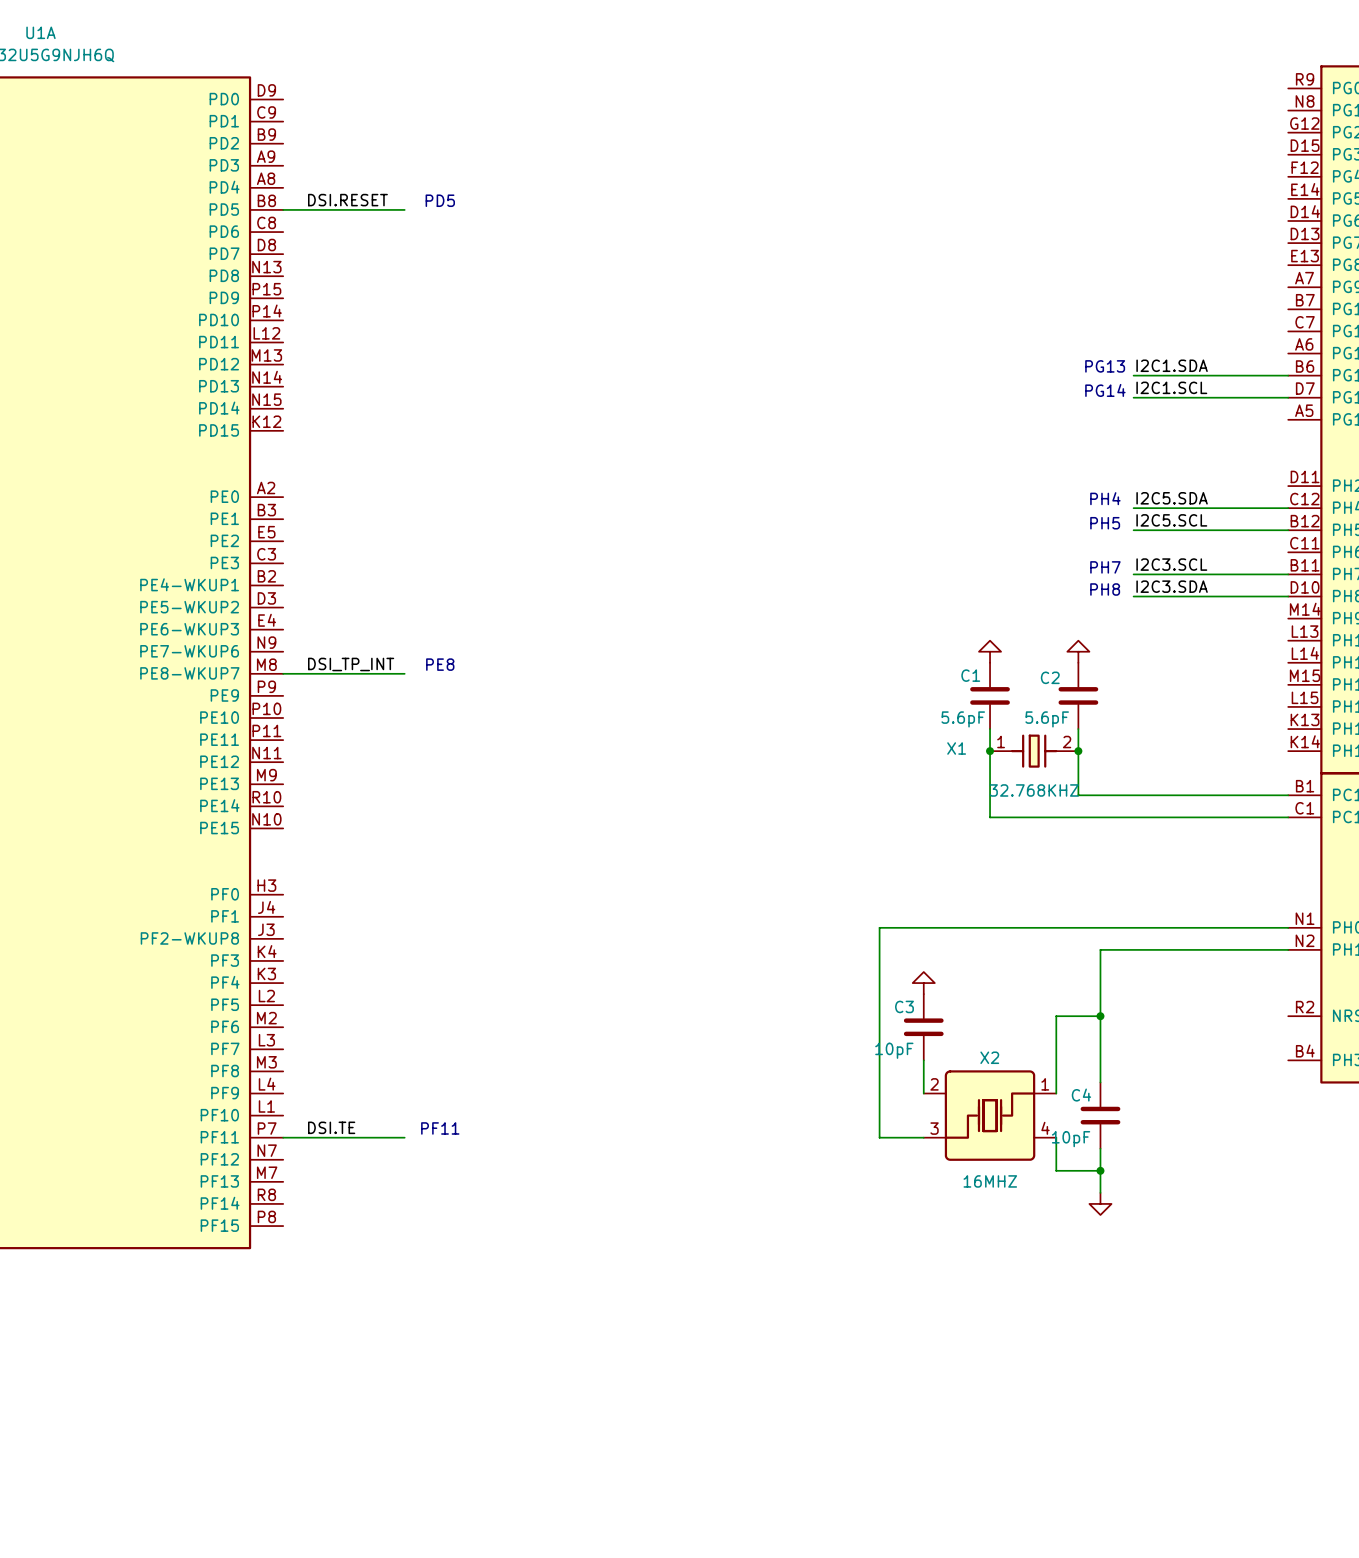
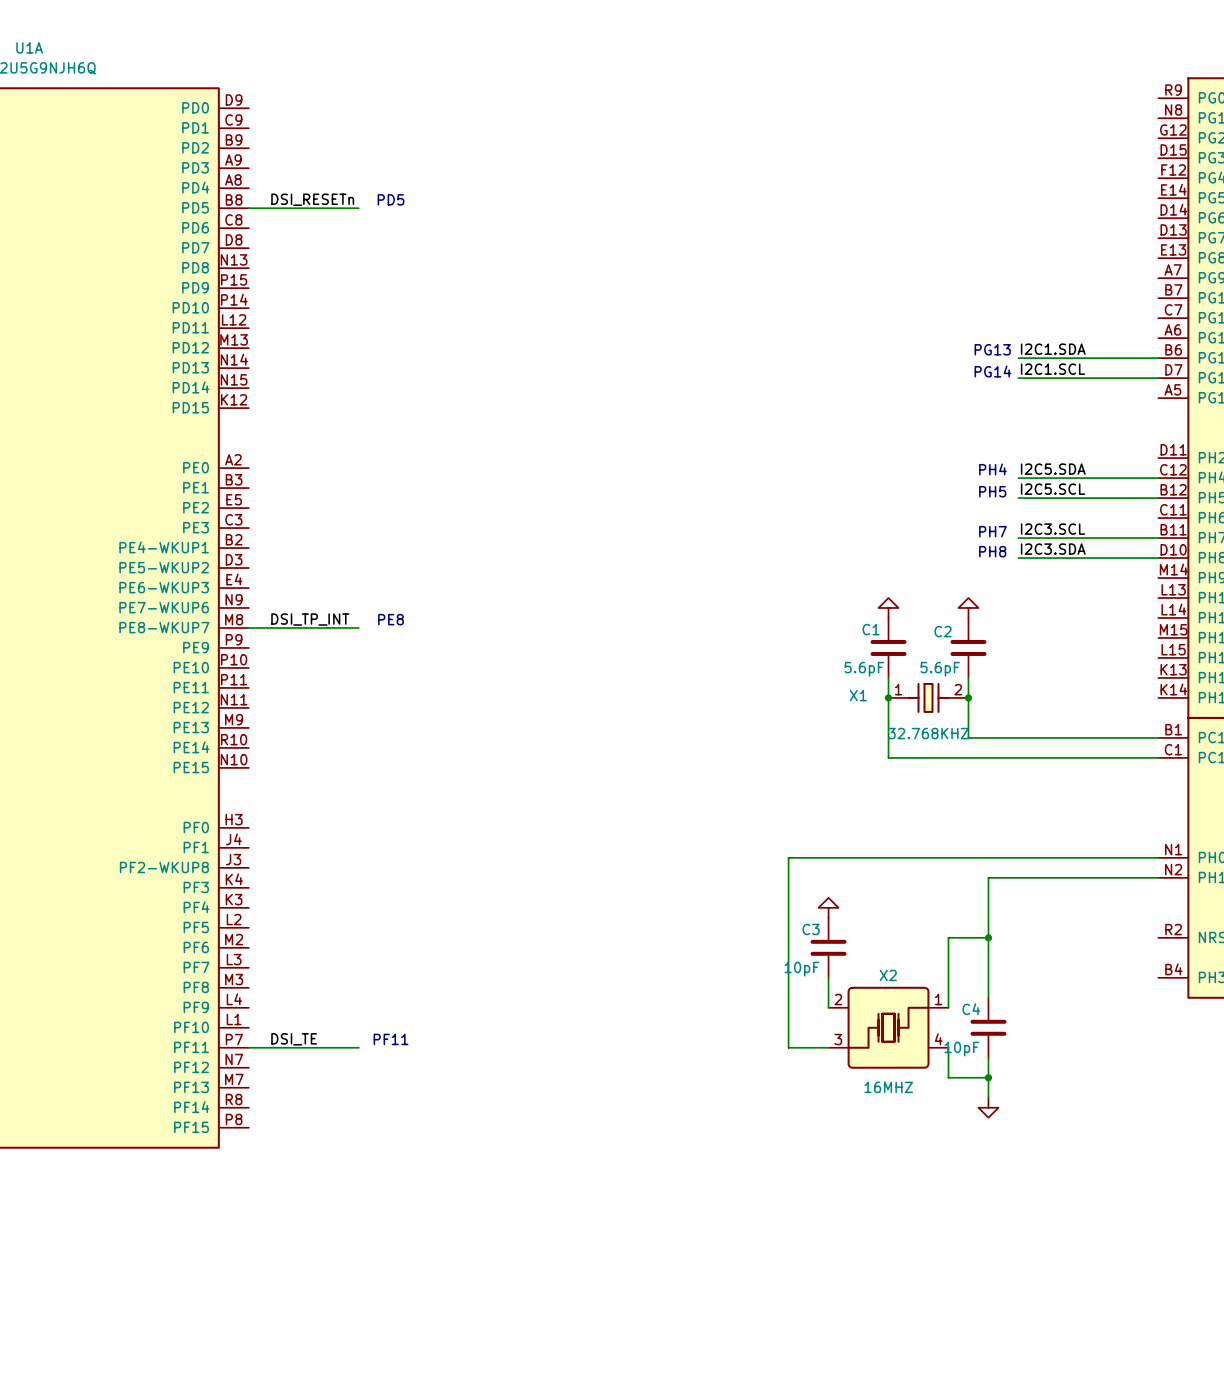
label: DSI.RESET (347, 200) -> DSI_RESETn (312, 199)
label: DSI.TE (331, 1127) -> DSI_TE (294, 1039)

